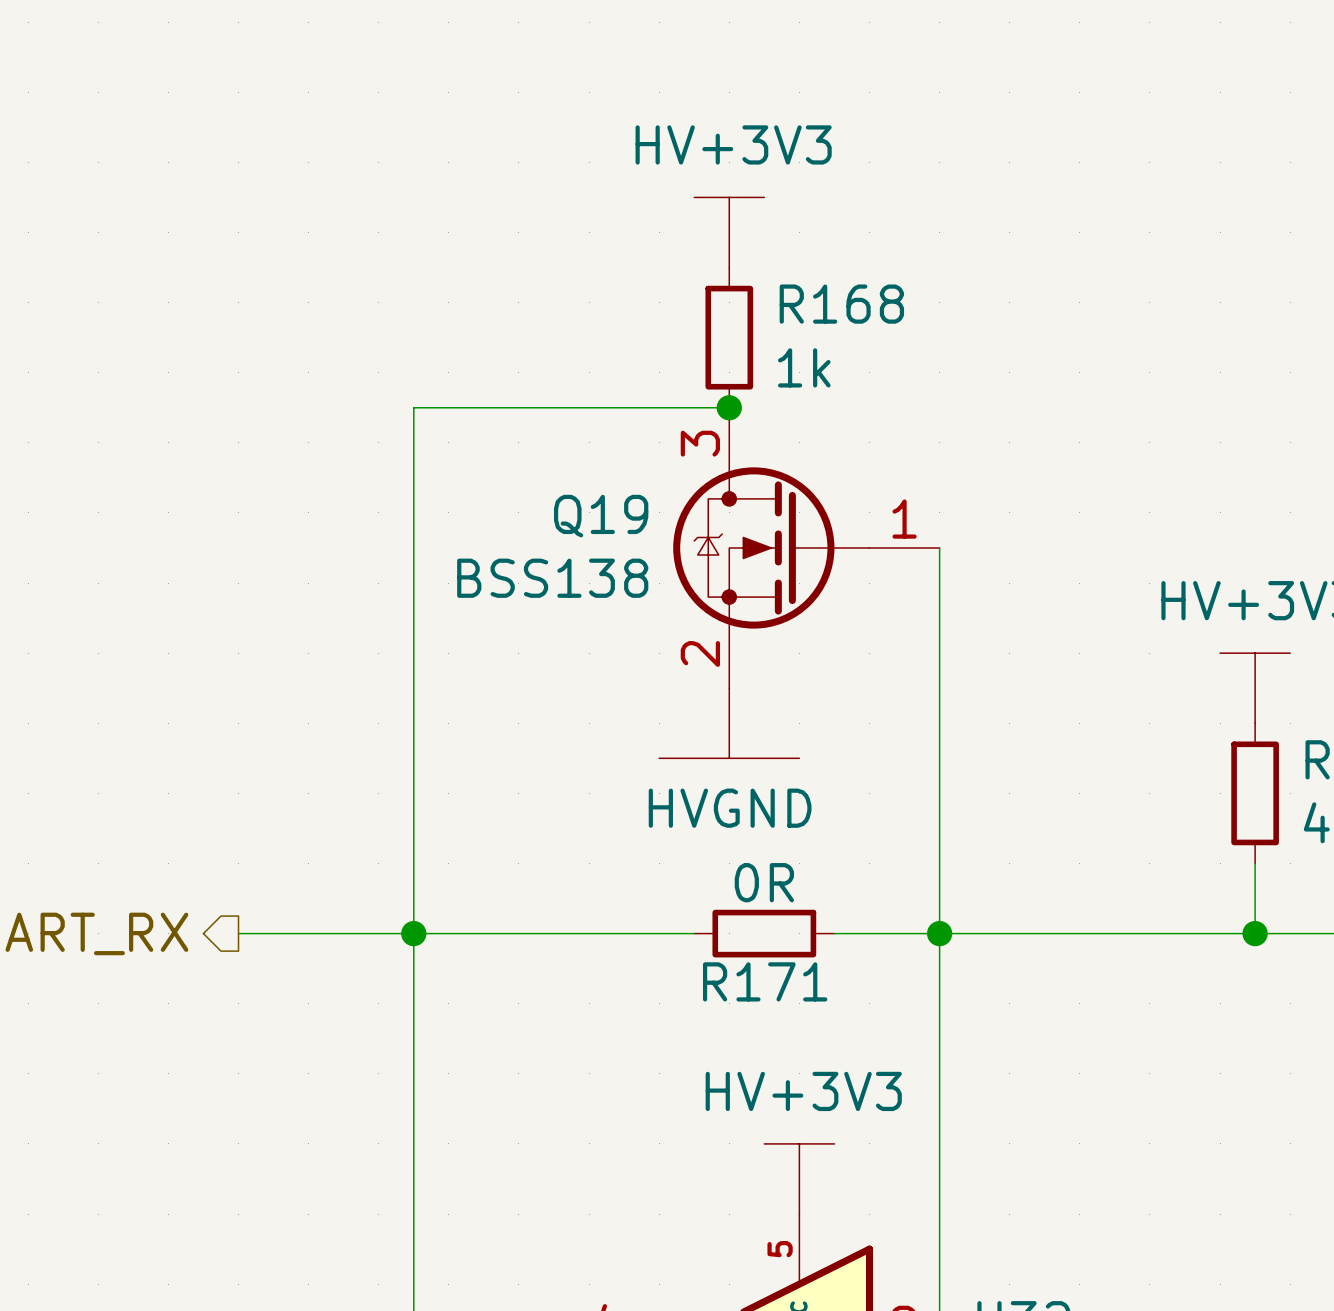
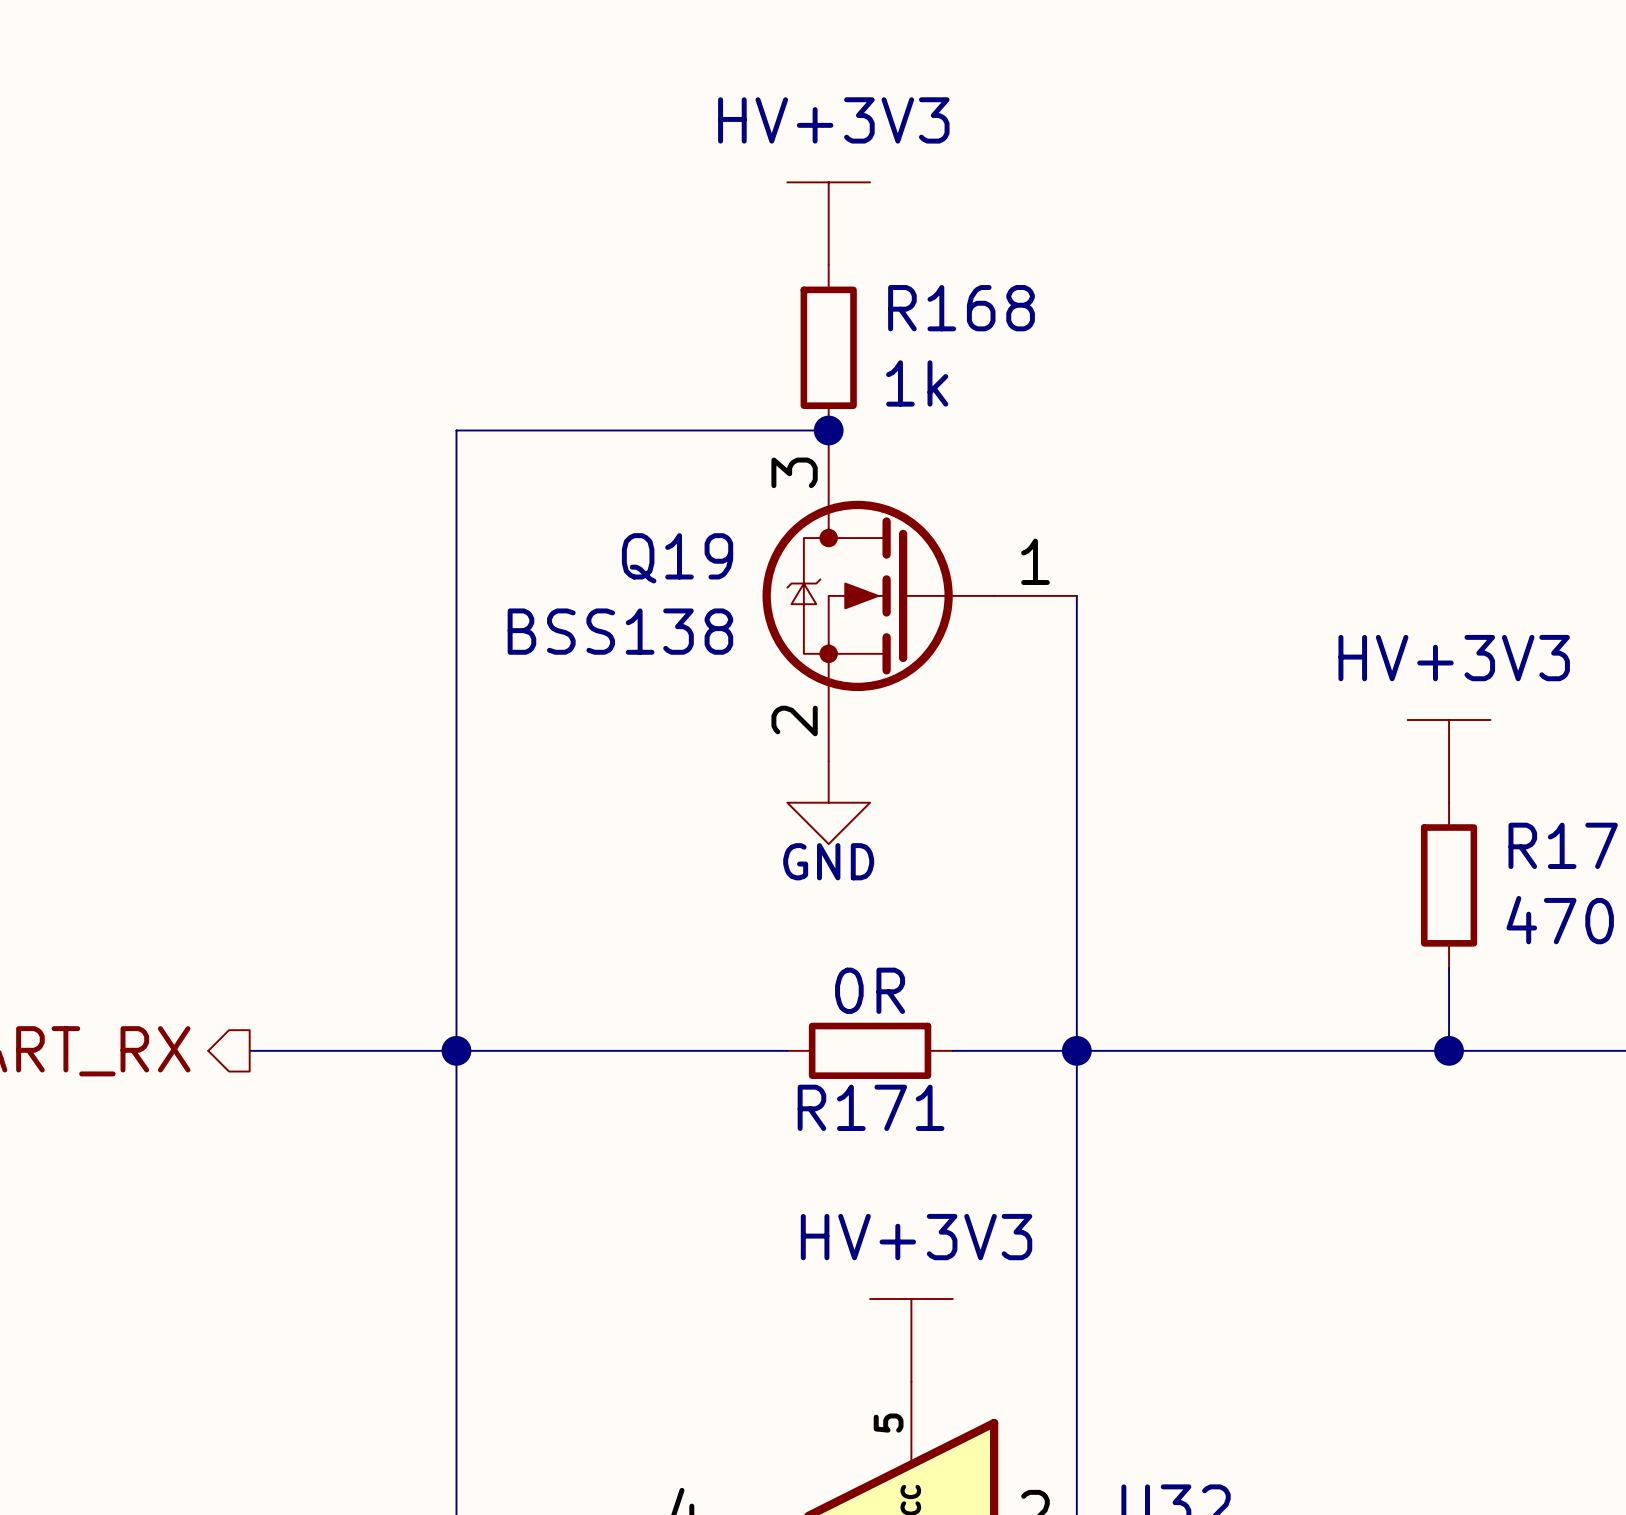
power symbol: HVGND (729, 723) -> GND (828, 802)

